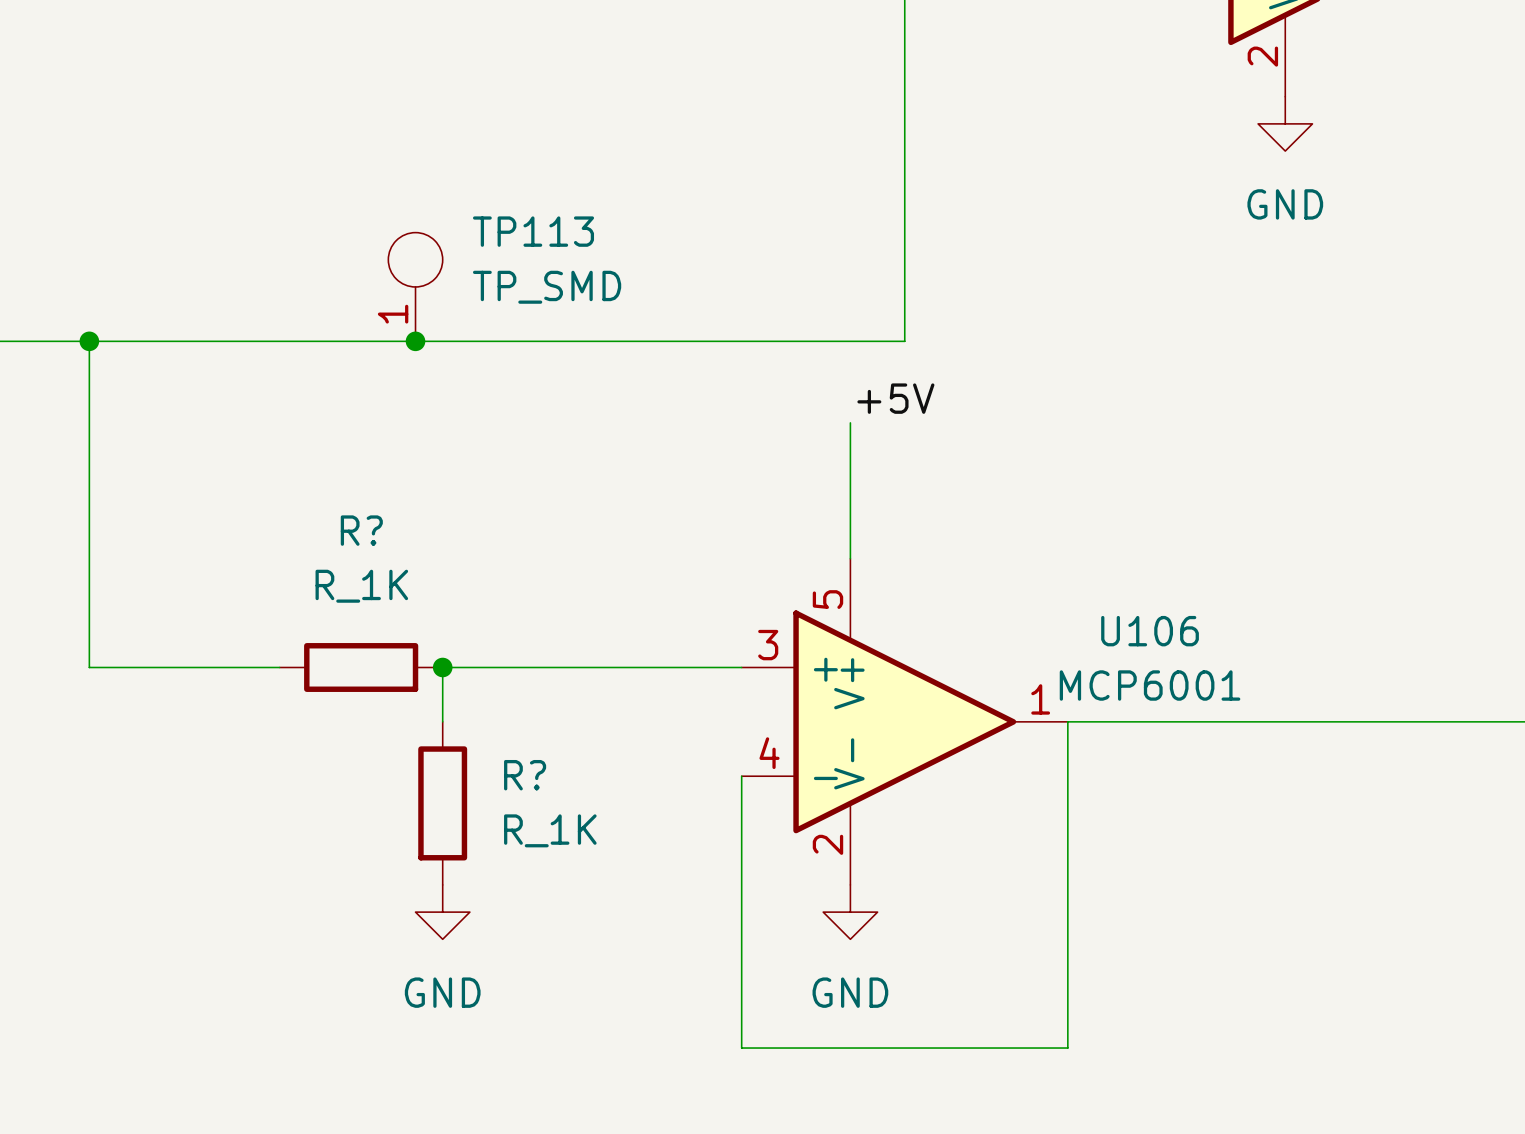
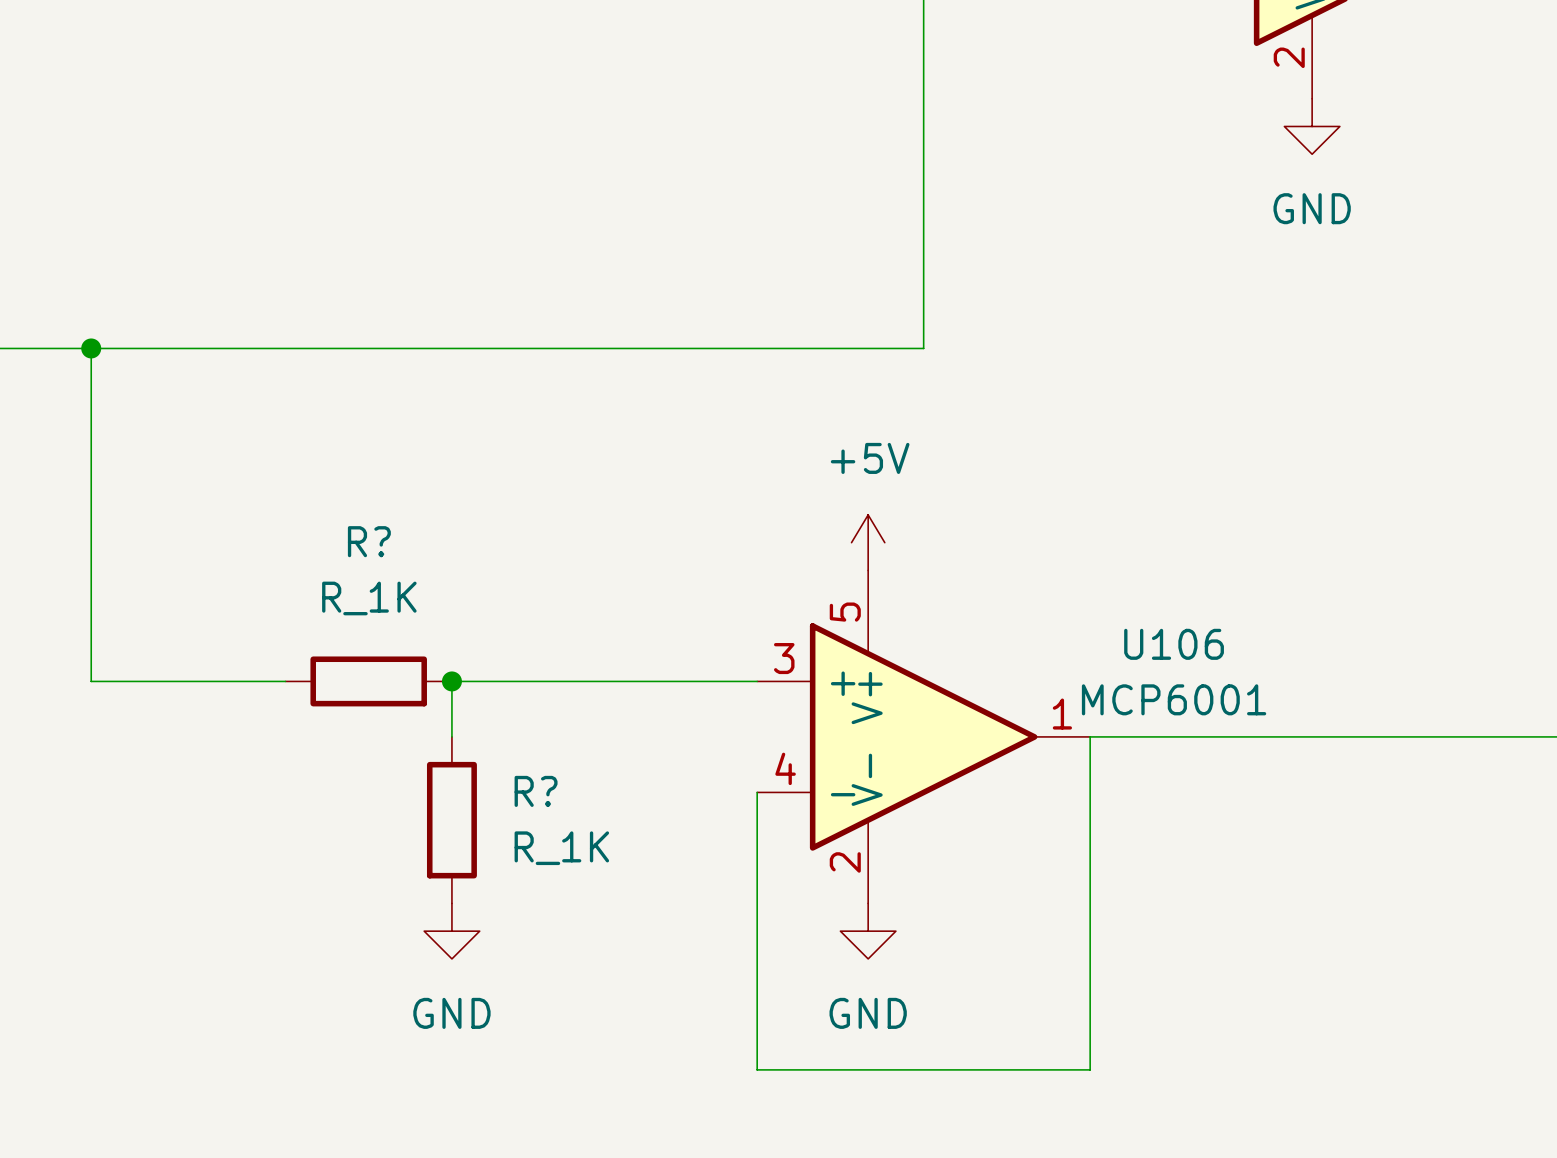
TP113: TP_SMD (415, 286) -> none
junction: (415, 341) -> none
label: +5V (895, 398) -> none
wire: (850, 422) (850, 558) -> none
power symbol: none -> +5V (868, 542)

